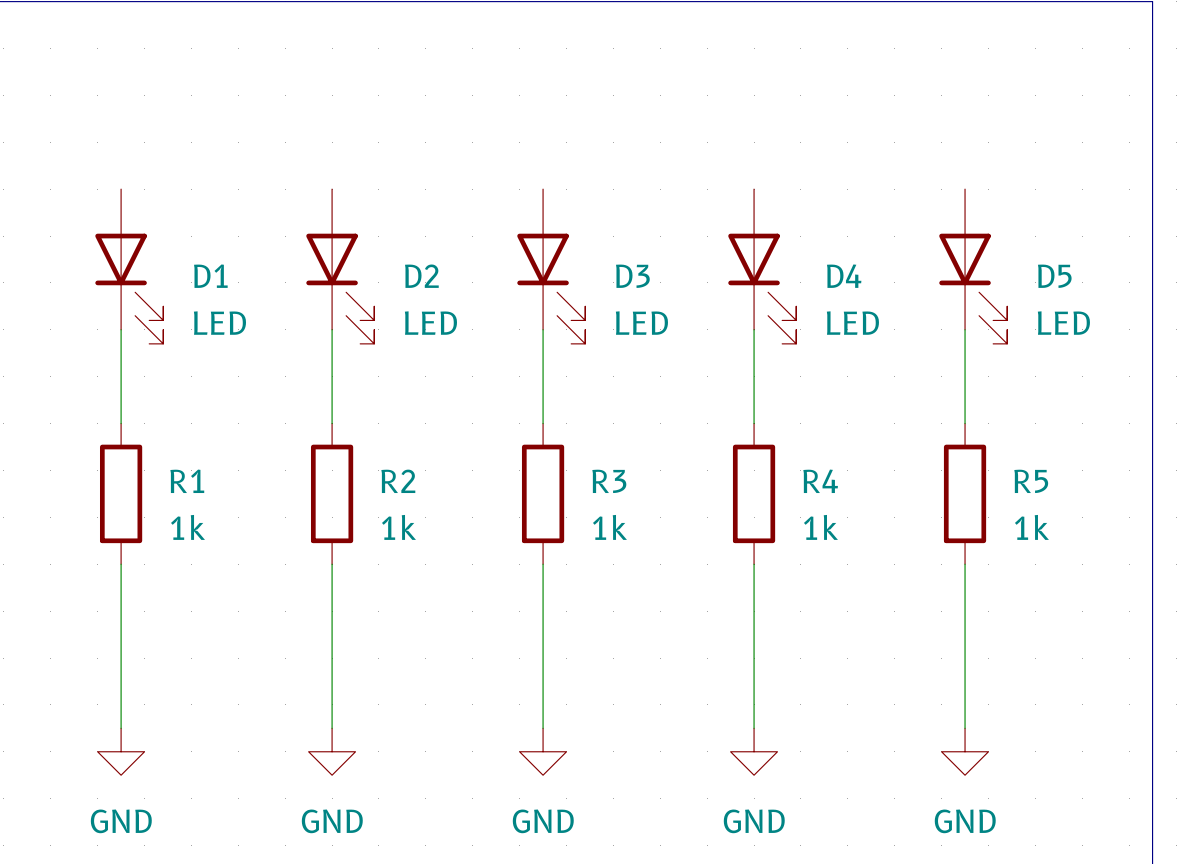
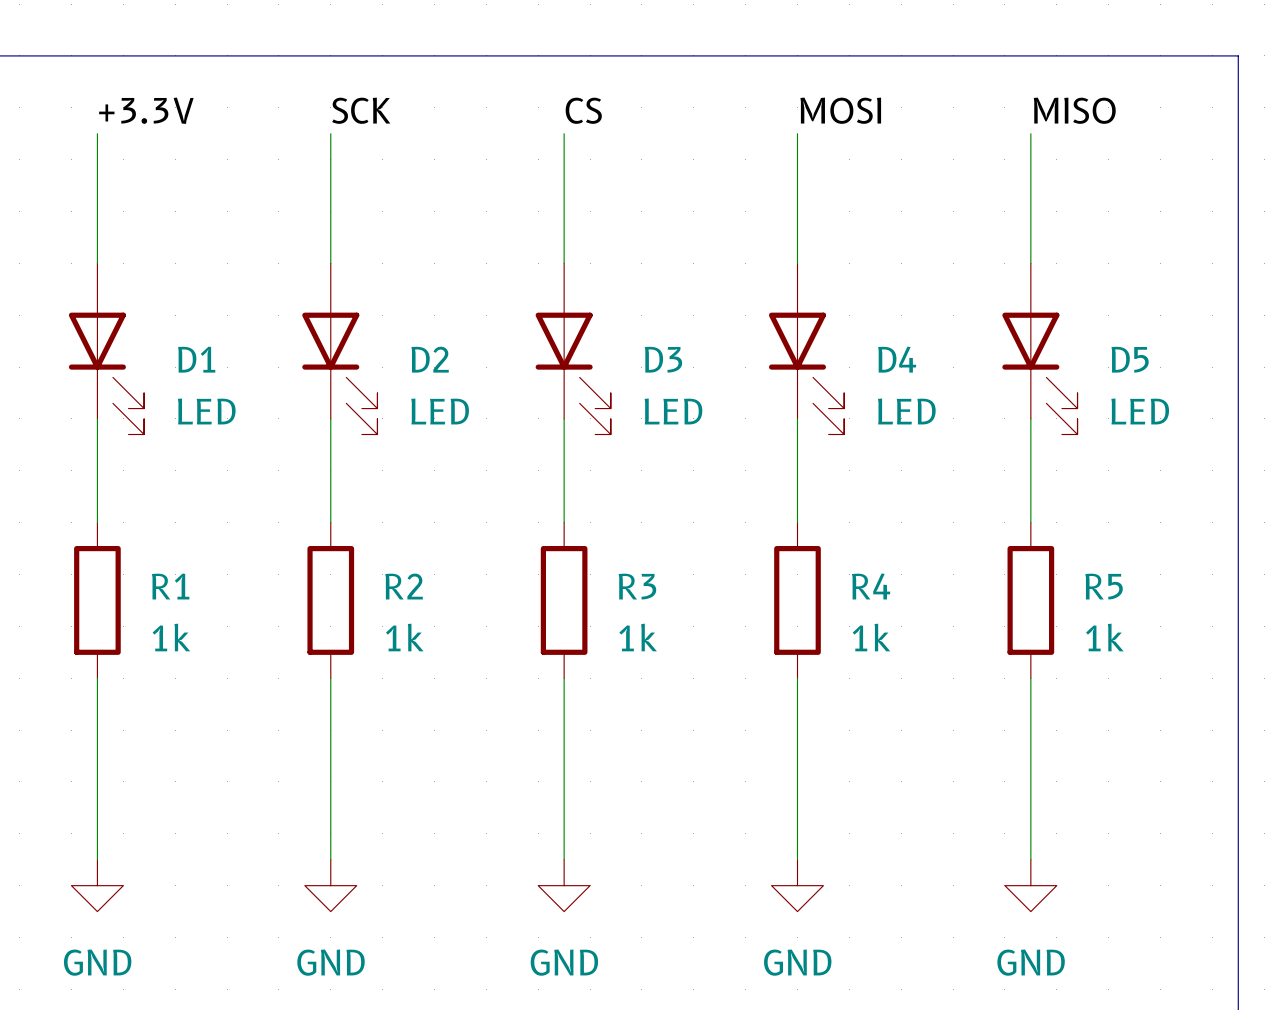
label: none -> +3.3V (146, 110)
label: none -> SCK (361, 110)
label: none -> CS (583, 110)
label: none -> MOSI (840, 110)
label: none -> MISO (1074, 110)
wire: none -> (97, 133) (97, 263)
wire: none -> (330, 133) (330, 263)
wire: none -> (564, 133) (564, 263)
wire: none -> (797, 133) (797, 263)
wire: none -> (1030, 133) (1030, 263)

